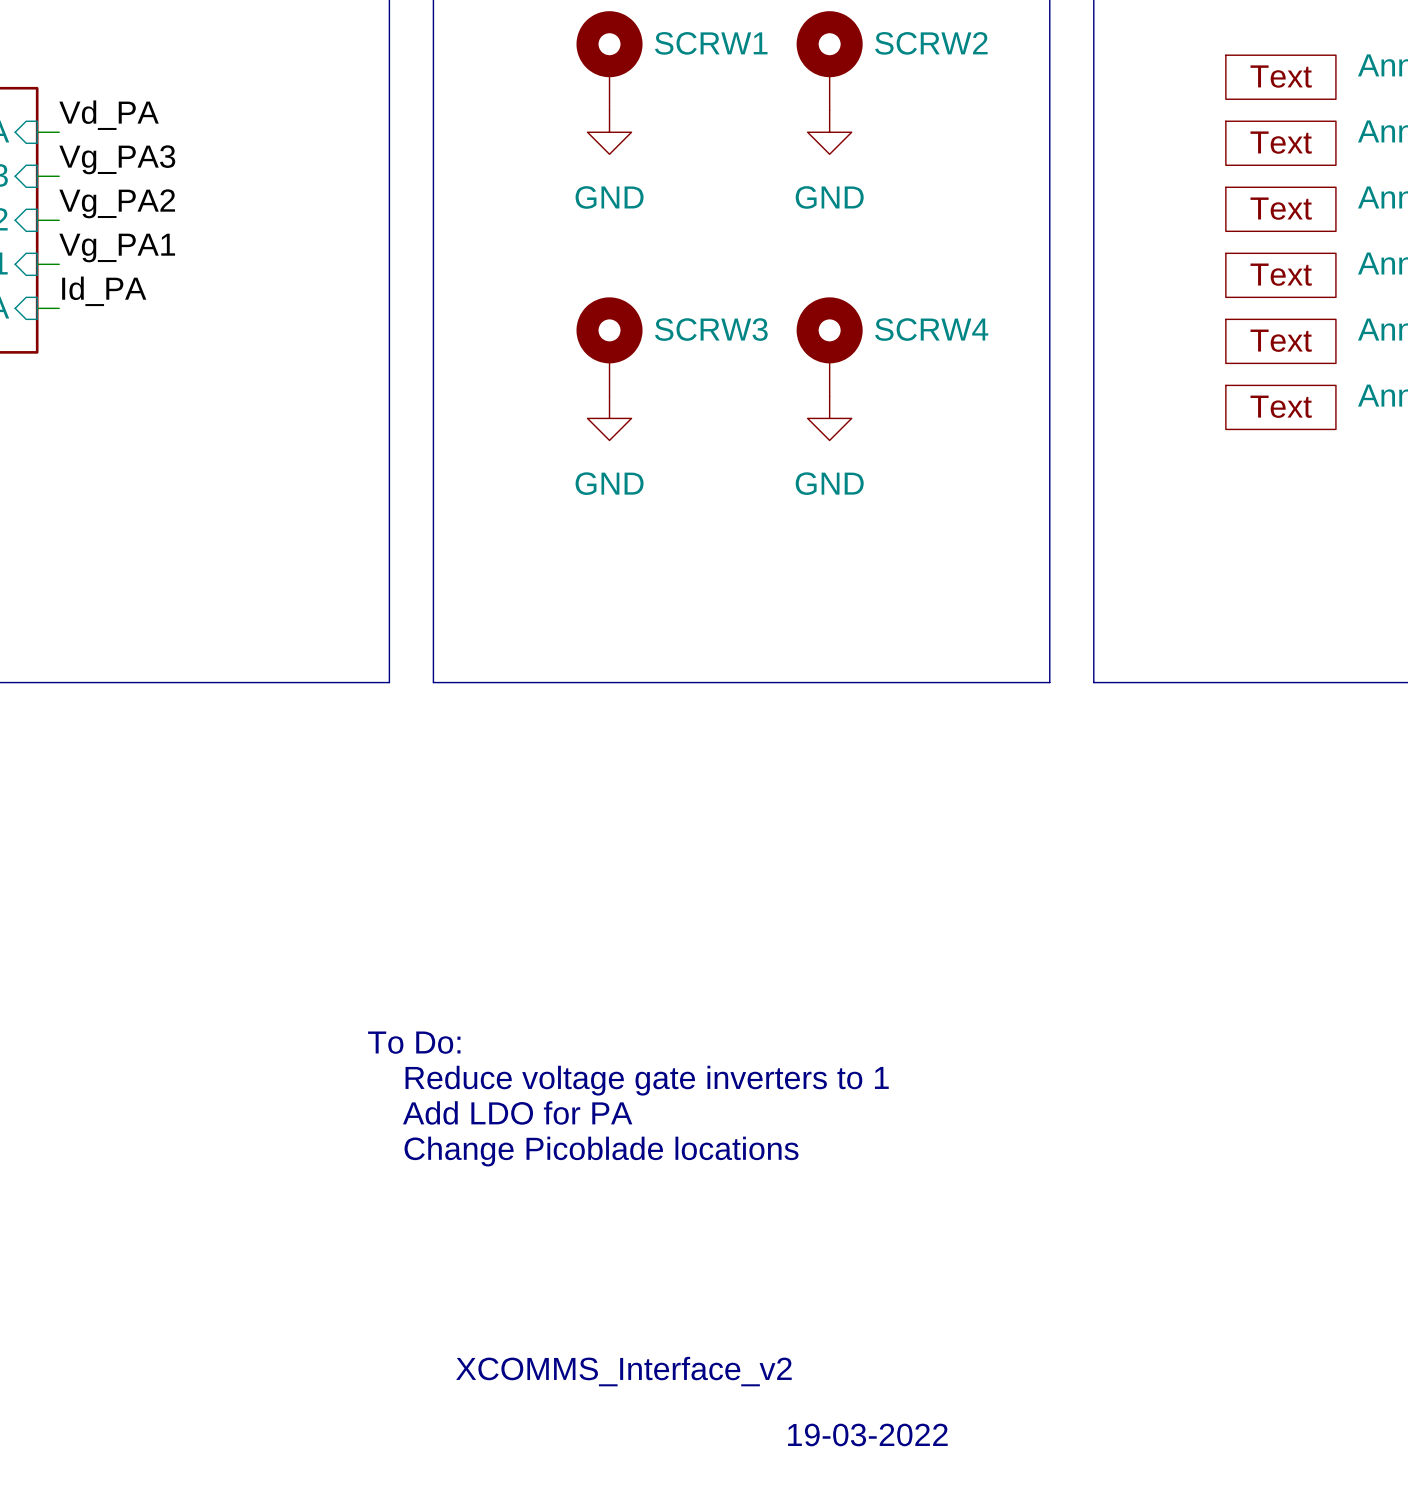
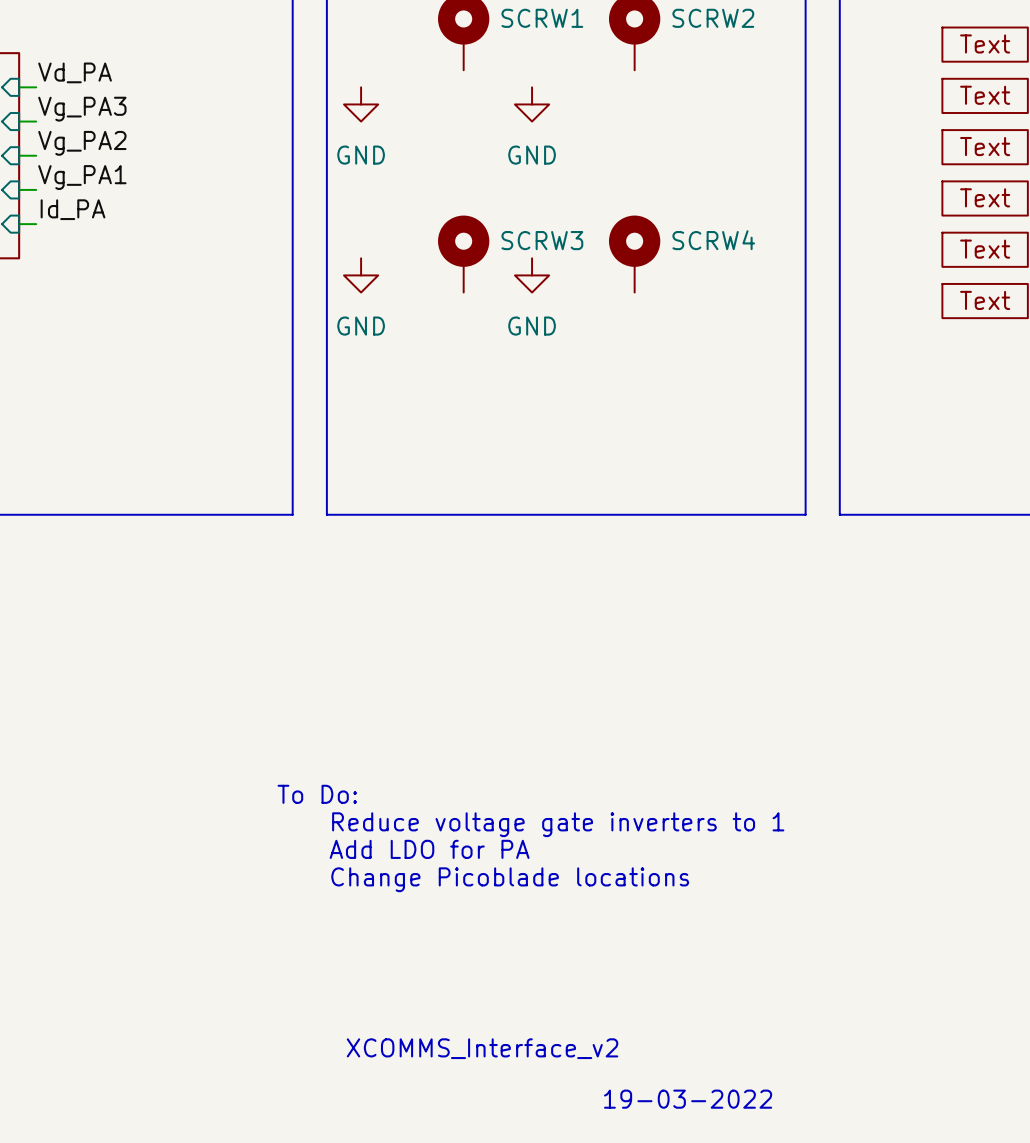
power symbol: GND (609, 132) -> none
power symbol: GND (829, 132) -> none
power symbol: none -> GND (361, 104)
power symbol: none -> GND (532, 104)
power symbol: none -> GND (361, 275)
power symbol: none -> GND (532, 275)
power symbol: GND (609, 418) -> none
power symbol: GND (829, 418) -> none

